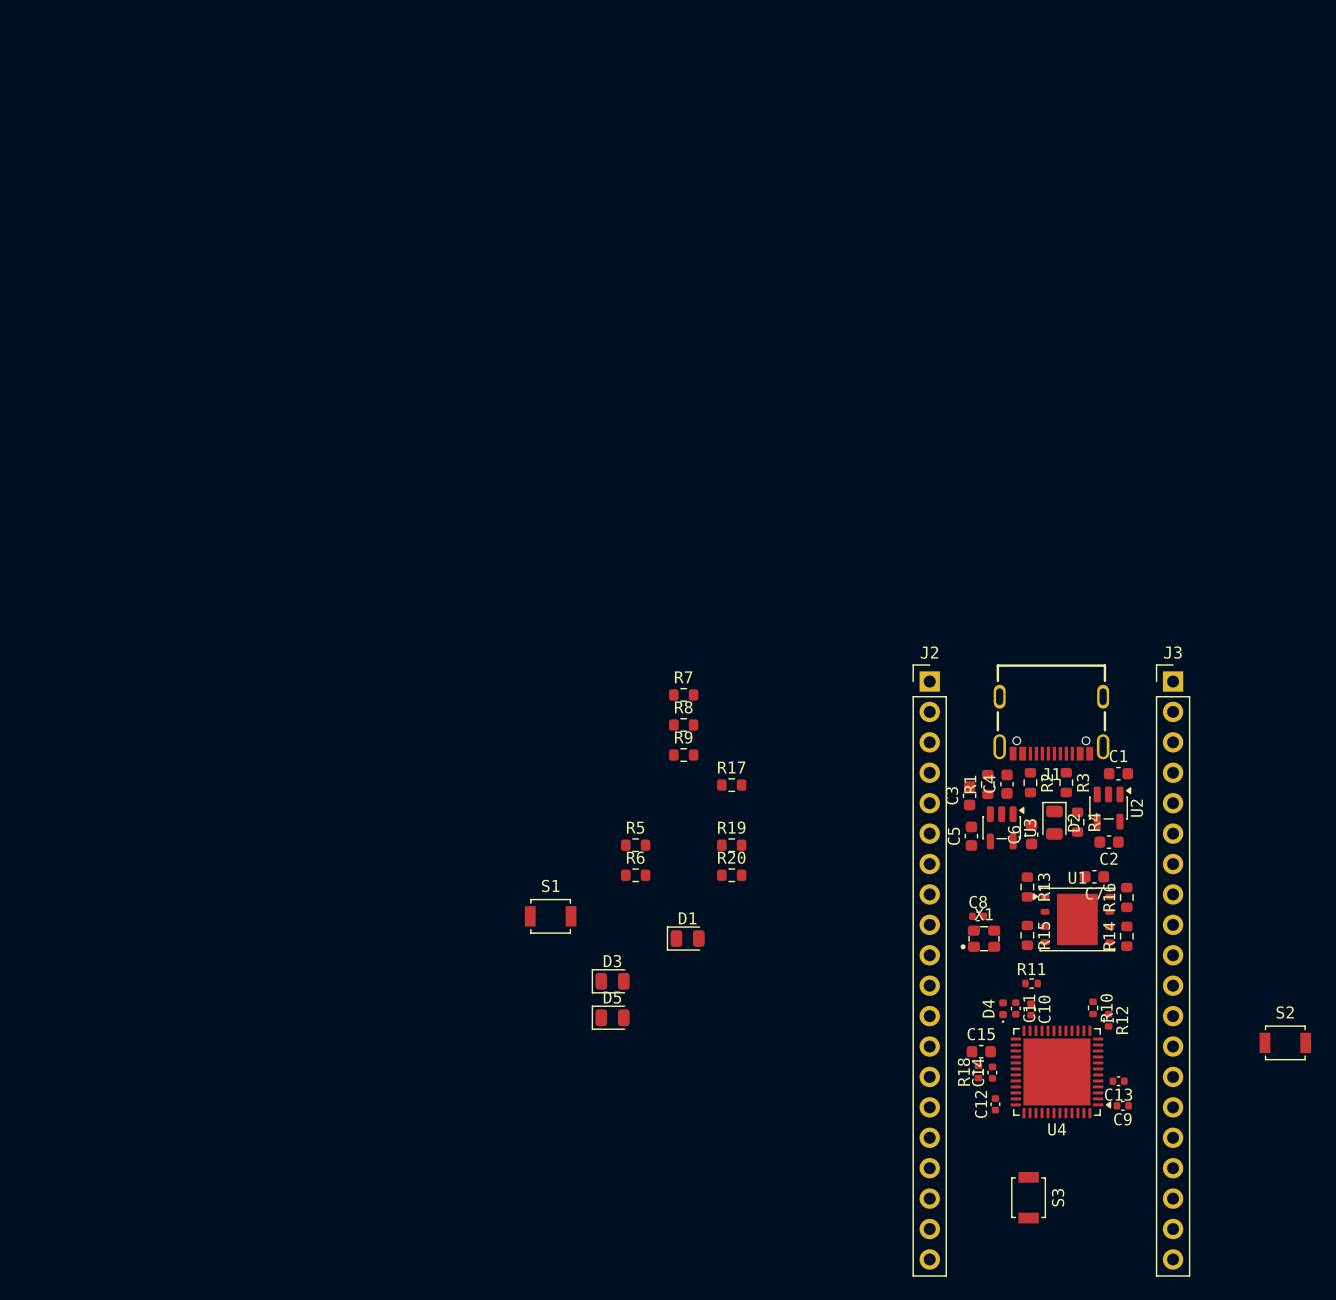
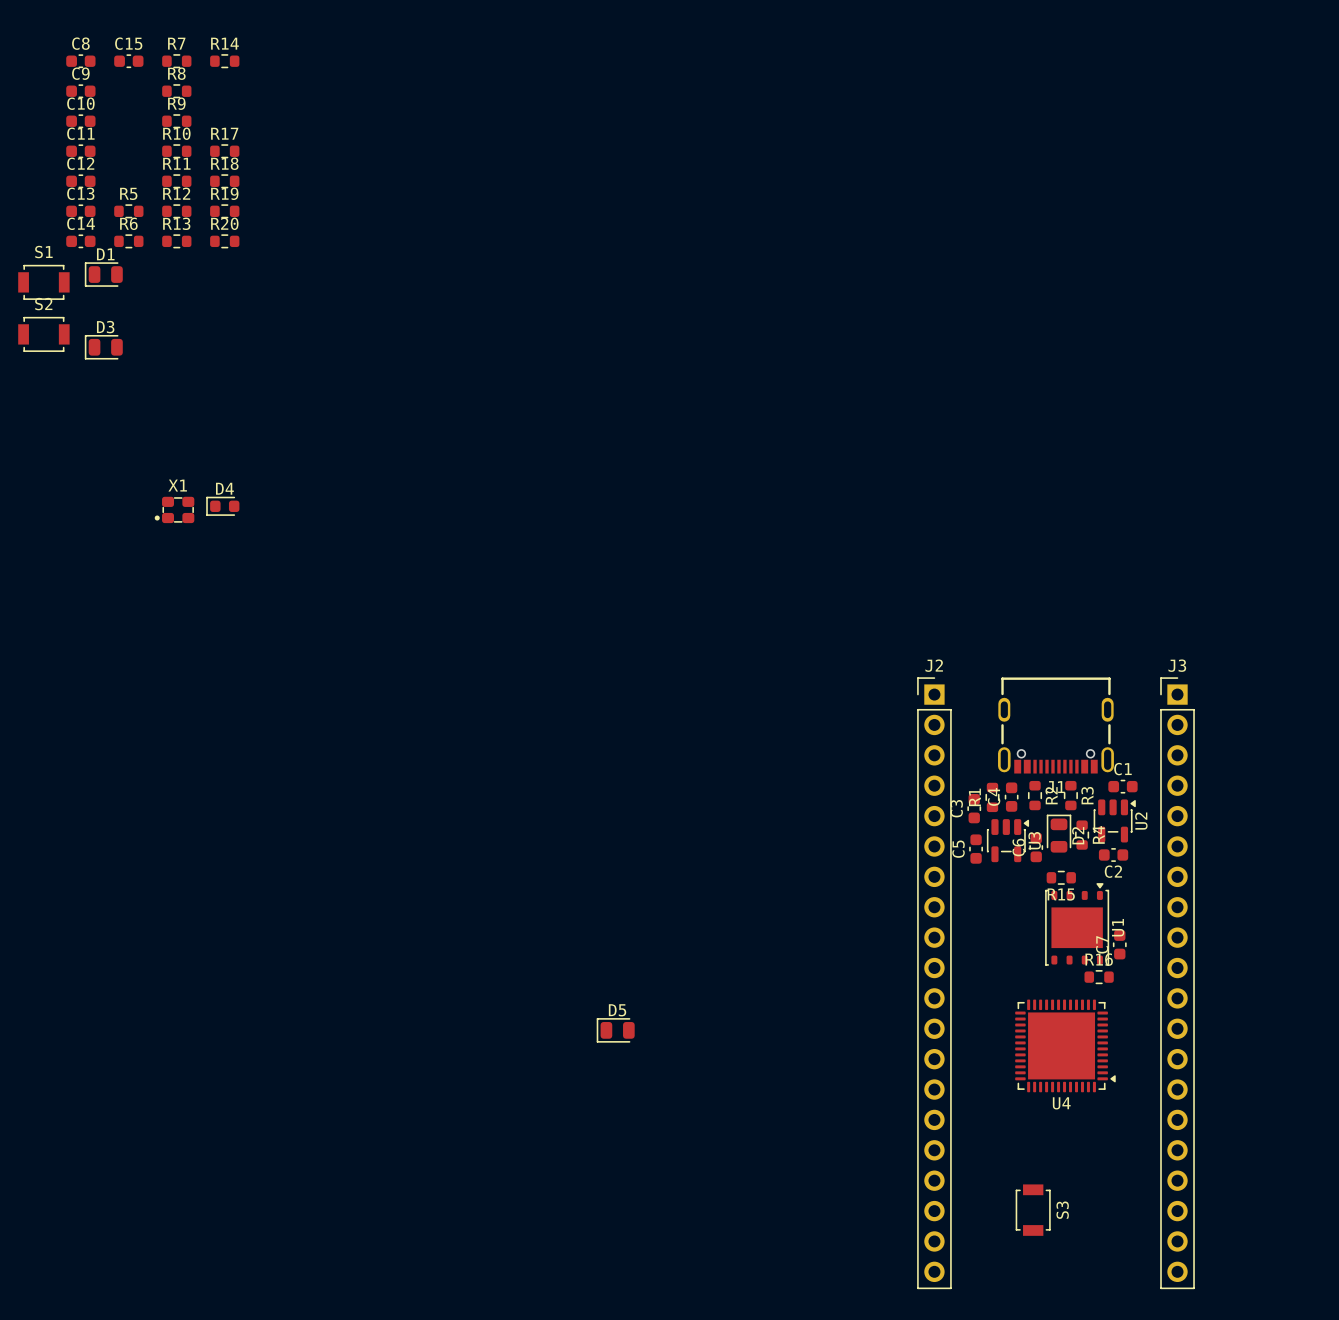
R7 position: (683, 694) -> (176, 61)
R8 position: (683, 724) -> (176, 91)
R9 position: (683, 755) -> (176, 121)
R17 position: (731, 785) -> (224, 151)
R5 position: (635, 845) -> (128, 211)
R19 position: (731, 845) -> (224, 211)
R6 position: (635, 875) -> (128, 241)
R20 position: (731, 875) -> (224, 241)
C7 rotation: 0° (1094, 876) -> 90° clockwise (1119, 944)
C7 position: (1094, 876) -> (1119, 944)
R13 rotation: 0° (1027, 887) -> 90° clockwise (176, 241)
R13 position: (1027, 887) -> (176, 241)
R13 name position: R13 (1044, 887) -> R13 (176, 223)
R16 rotation: 0° (1126, 897) -> 90° clockwise (1099, 977)
R16 position: (1126, 897) -> (1099, 977)
C8 footprint: [969, 911, 988, 922] -> [66, 54, 96, 69]
S1 position: (550, 916) -> (43, 282)
U1 rotation: 0° (1074, 919) -> 90° clockwise (1077, 924)
R15 rotation: 0° (1027, 935) -> 90° clockwise (1061, 877)
R15 position: (1027, 935) -> (1061, 877)
R14 rotation: 0° (1126, 936) -> 90° clockwise (224, 61)
R14 position: (1126, 936) -> (224, 61)
D1 position: (685, 938) -> (103, 274)
X1 position: (980, 938) -> (174, 509)
R11 footprint: [1022, 978, 1041, 989] -> [162, 174, 192, 189]
D3 position: (610, 981) -> (103, 347)
R10 footprint: [1087, 998, 1099, 1018] -> [162, 144, 192, 159]
D4 footprint: [999, 999, 1007, 1023] -> [206, 496, 240, 516]
C11 footprint: [1010, 999, 1021, 1018] -> [66, 144, 96, 159]
C10 footprint: [1025, 1000, 1037, 1019] -> [66, 114, 96, 129]
R12 footprint: [1103, 1011, 1114, 1030] -> [162, 204, 192, 219]
S2 position: (1285, 1042) -> (43, 334)
C15 position: (981, 1051) -> (128, 61)
R18 footprint: [973, 1062, 984, 1082] -> [210, 174, 240, 189]
C14 footprint: [987, 1063, 998, 1082] -> [66, 234, 96, 249]
U4 position: (1060, 1071) -> (1065, 1045)
C13 footprint: [1109, 1076, 1128, 1087] -> [66, 204, 96, 219]
C13 name position: C13 (1118, 1094) -> C13 (80, 193)
C12 footprint: [990, 1095, 1001, 1114] -> [66, 174, 96, 189]
C9 footprint: [1113, 1100, 1132, 1111] -> [66, 84, 96, 99]
C9 name position: C9 (1122, 1119) -> C9 (80, 73)

